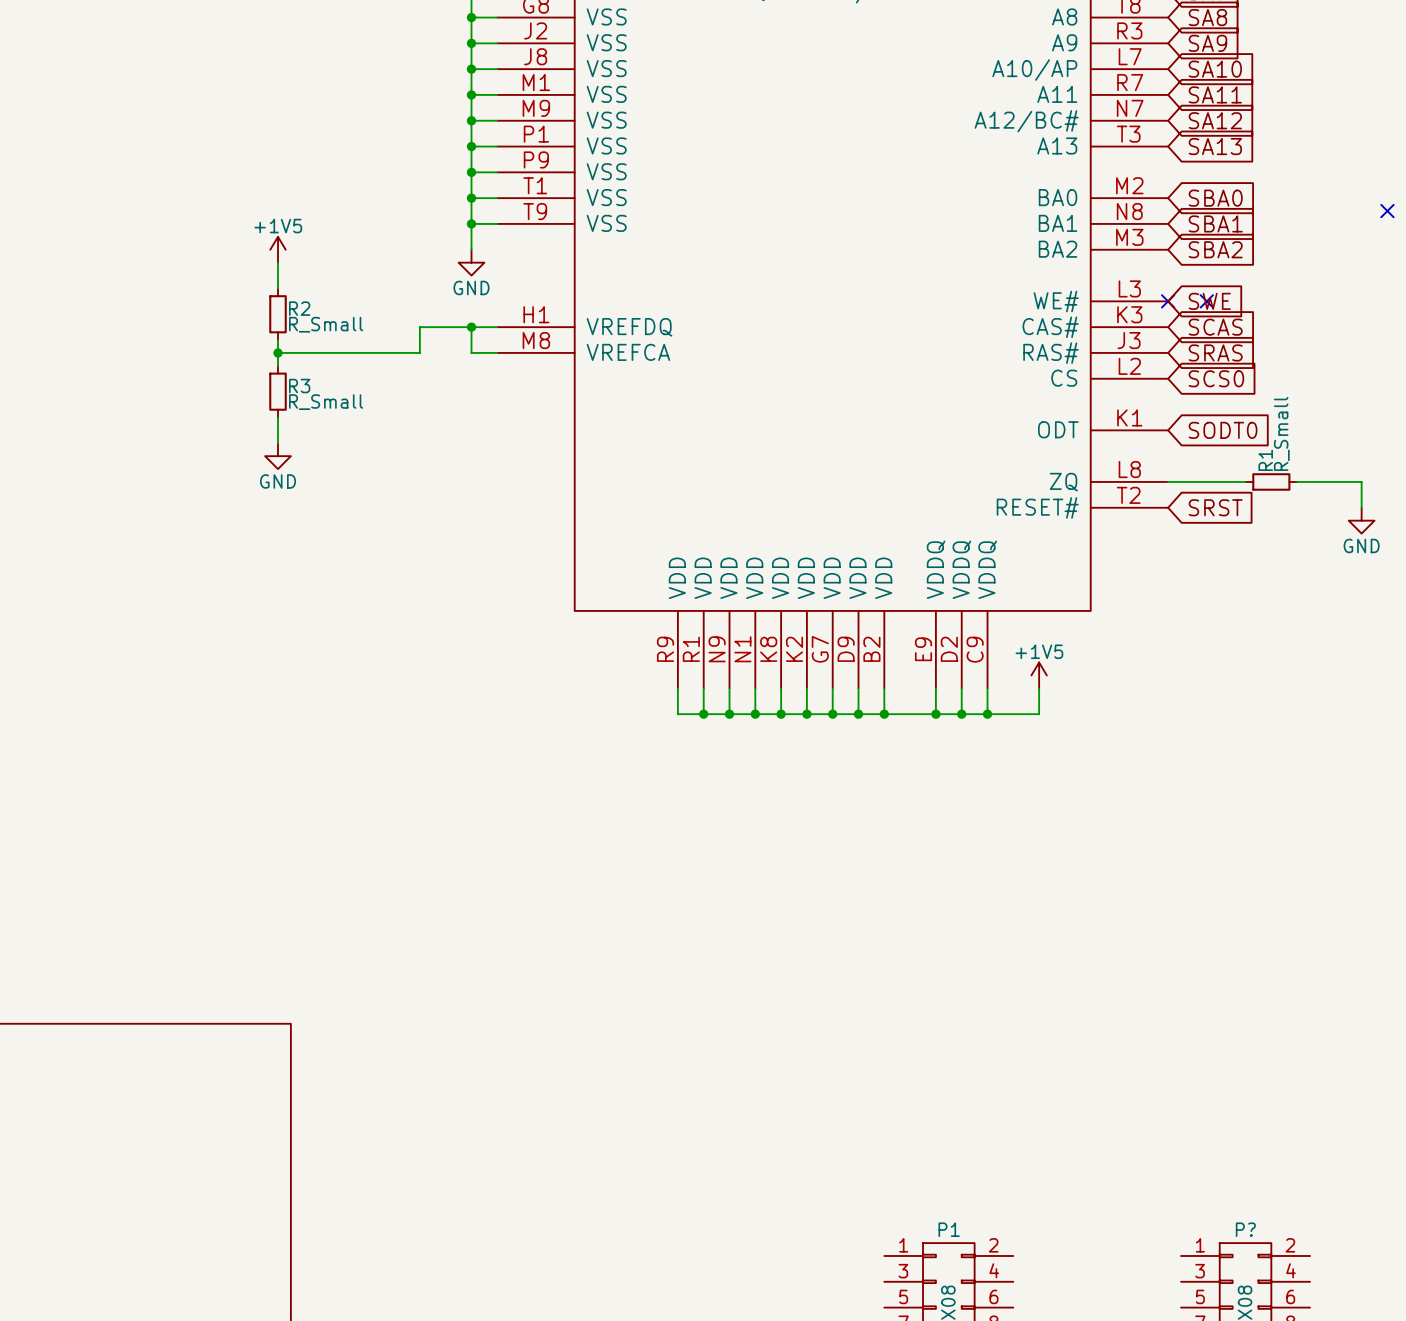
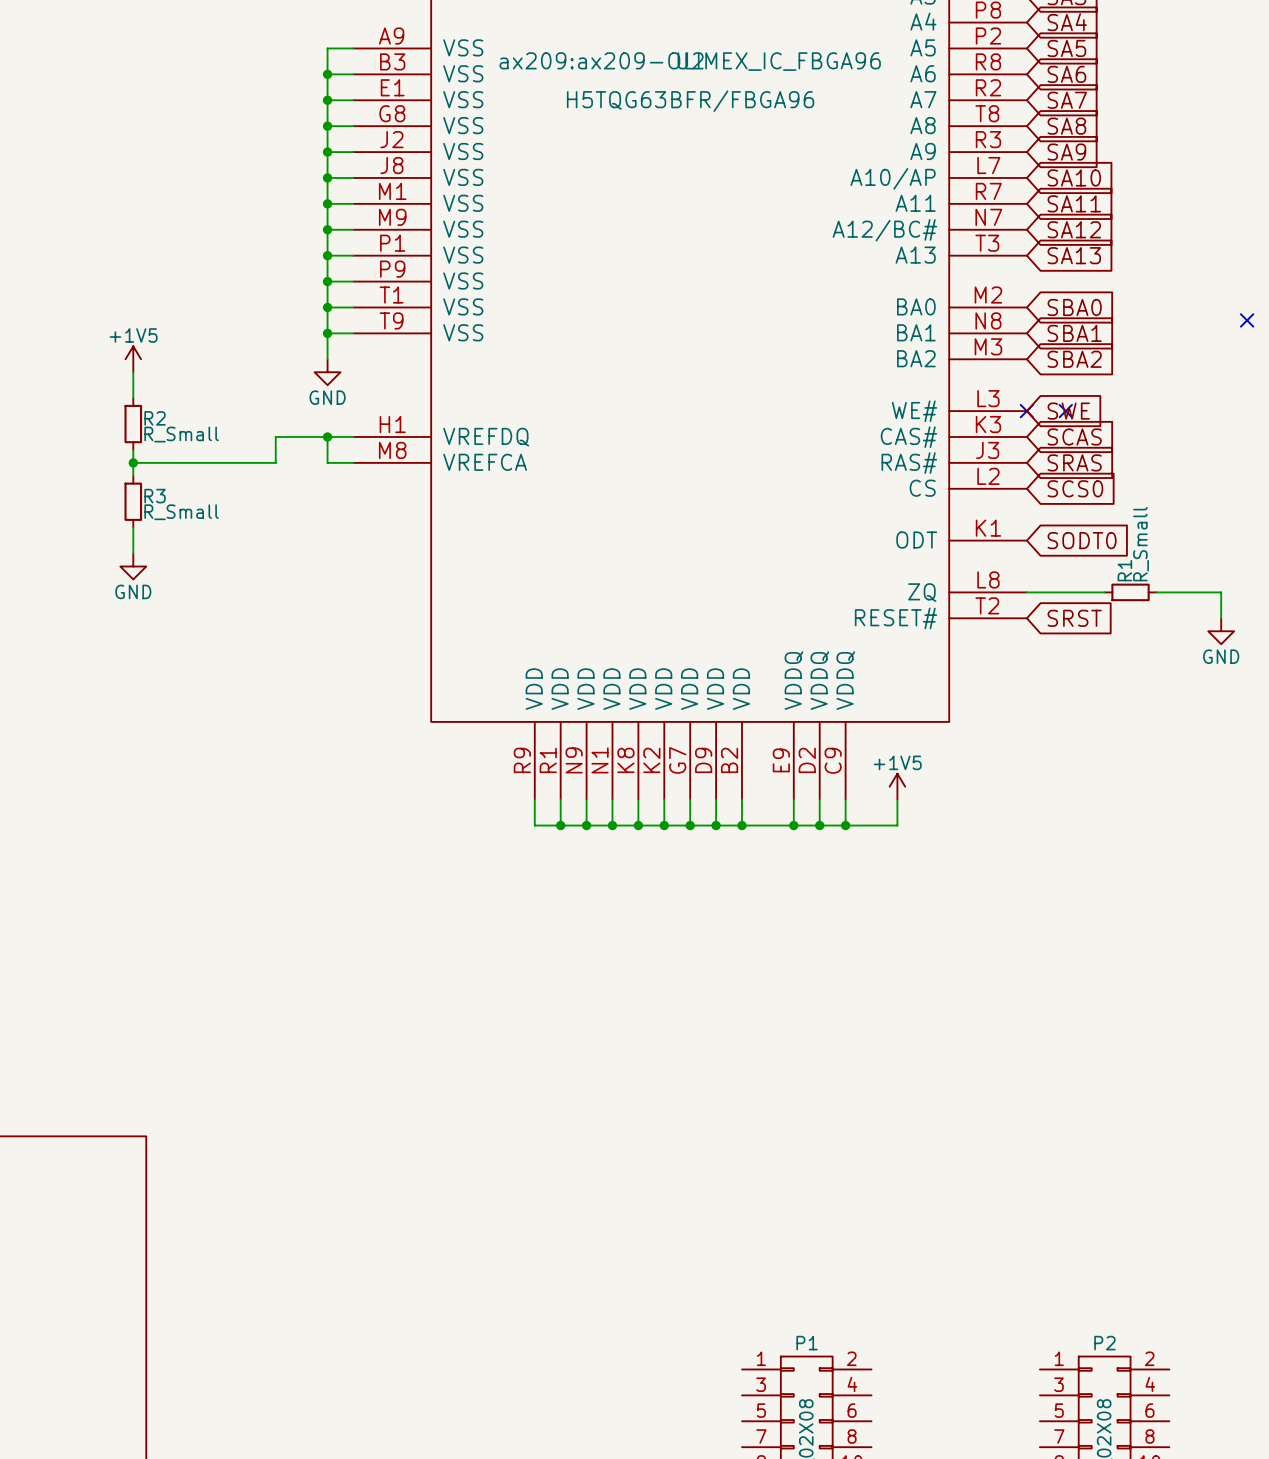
P? name: P? (1245, 1229) -> P2 (1104, 1343)

